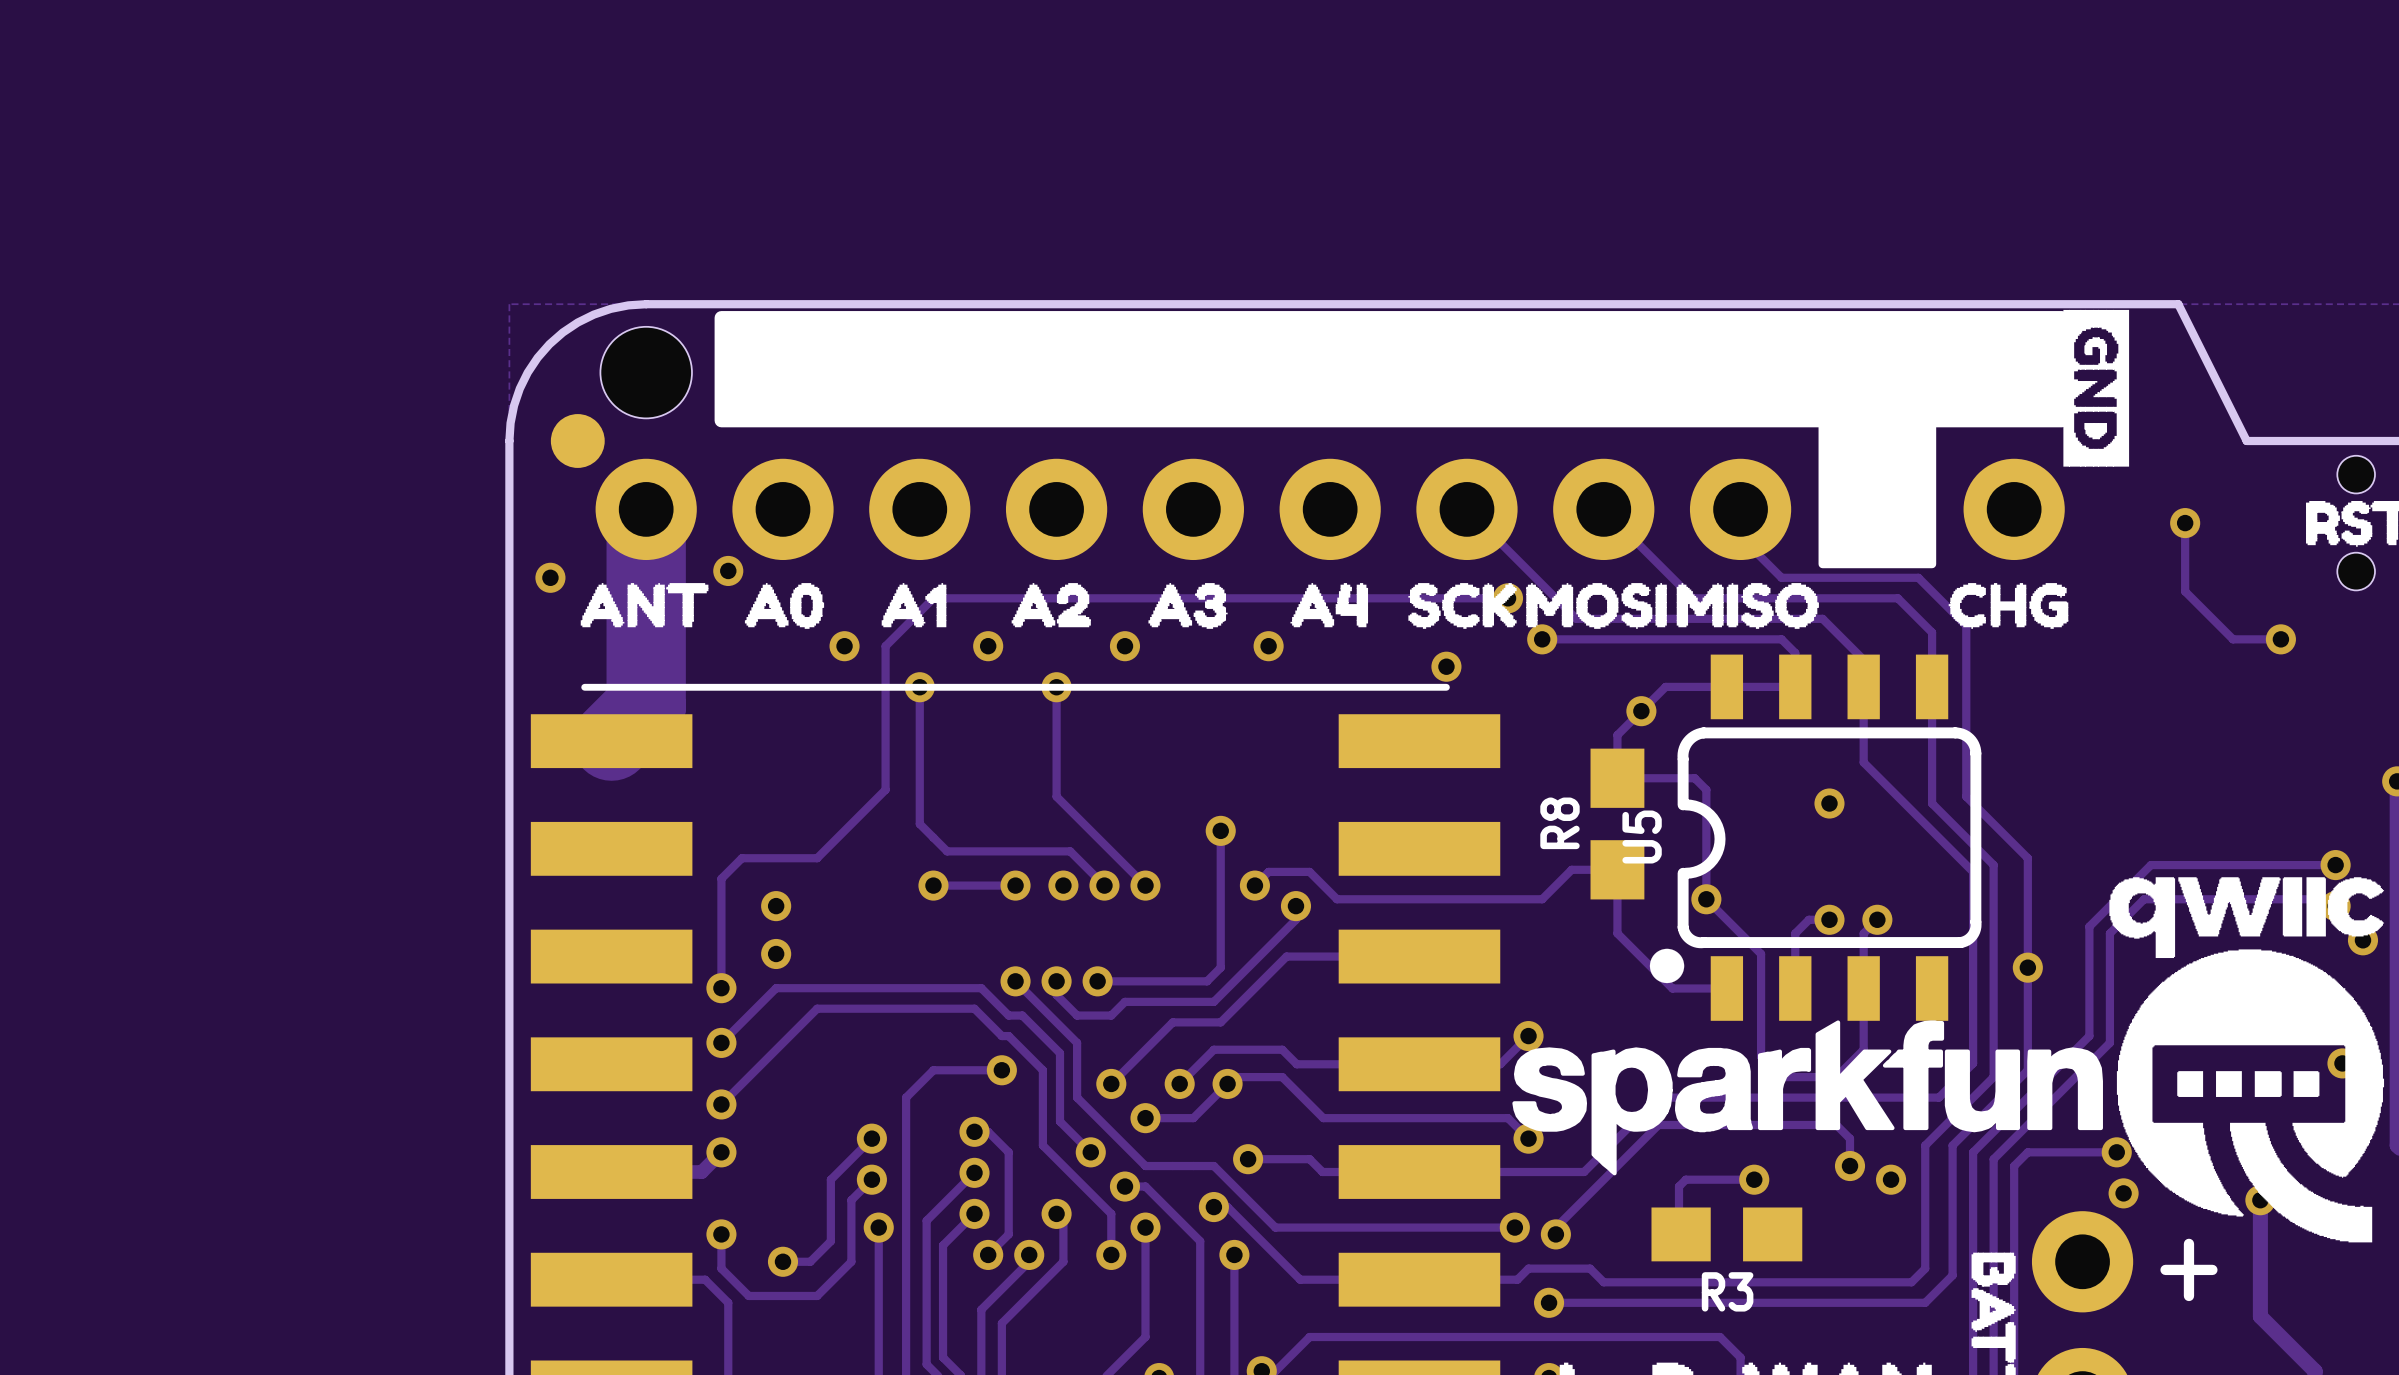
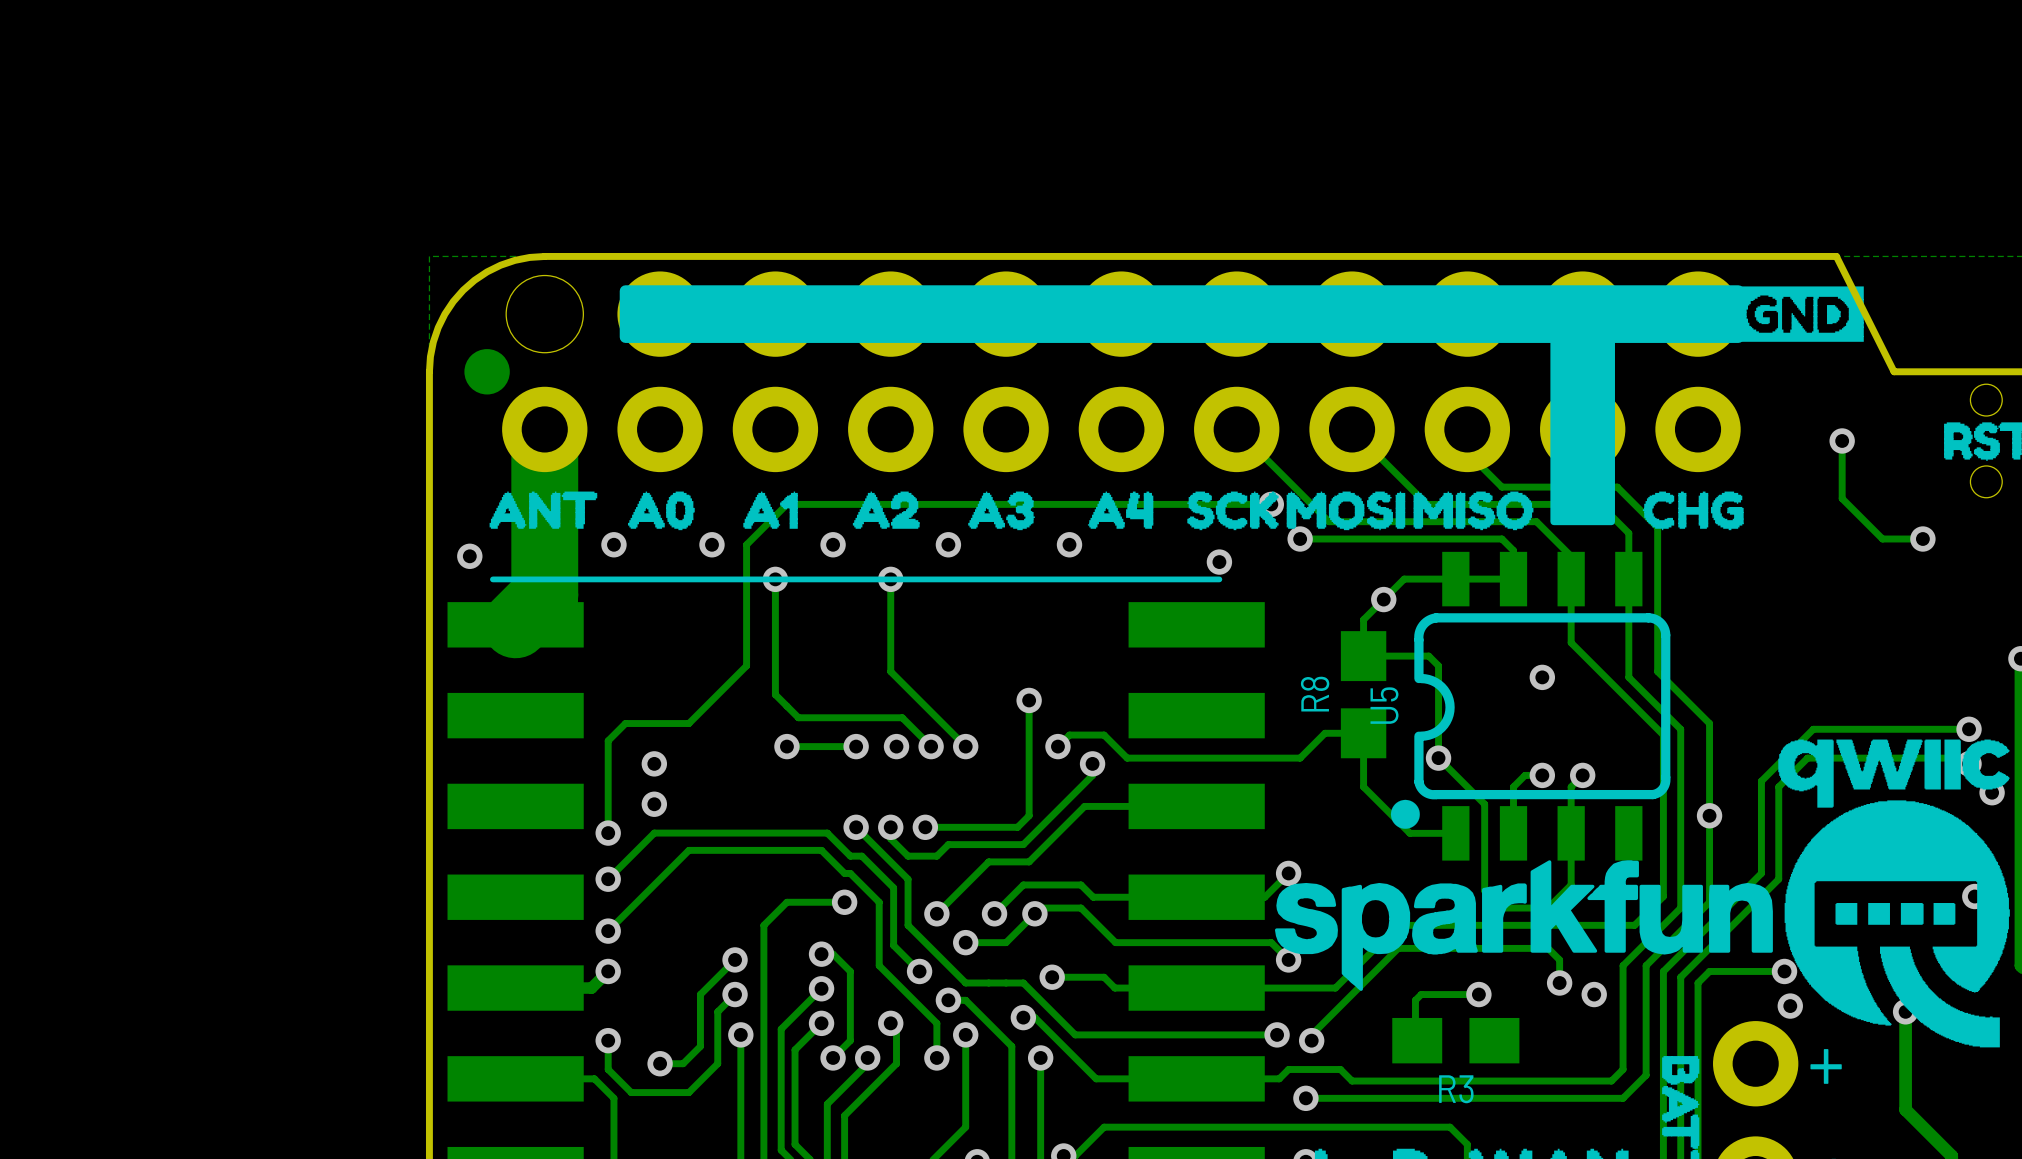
drawing shape: [2063, 309, 2130, 467] -> [1731, 286, 1864, 342]
drawing shape: [714, 311, 2069, 428] -> [619, 285, 1745, 343]
drawing shape: [1818, 402, 1937, 569] -> [1550, 339, 1615, 526]
via position: (728, 570) -> (613, 544)
via position: (550, 577) -> (469, 556)

